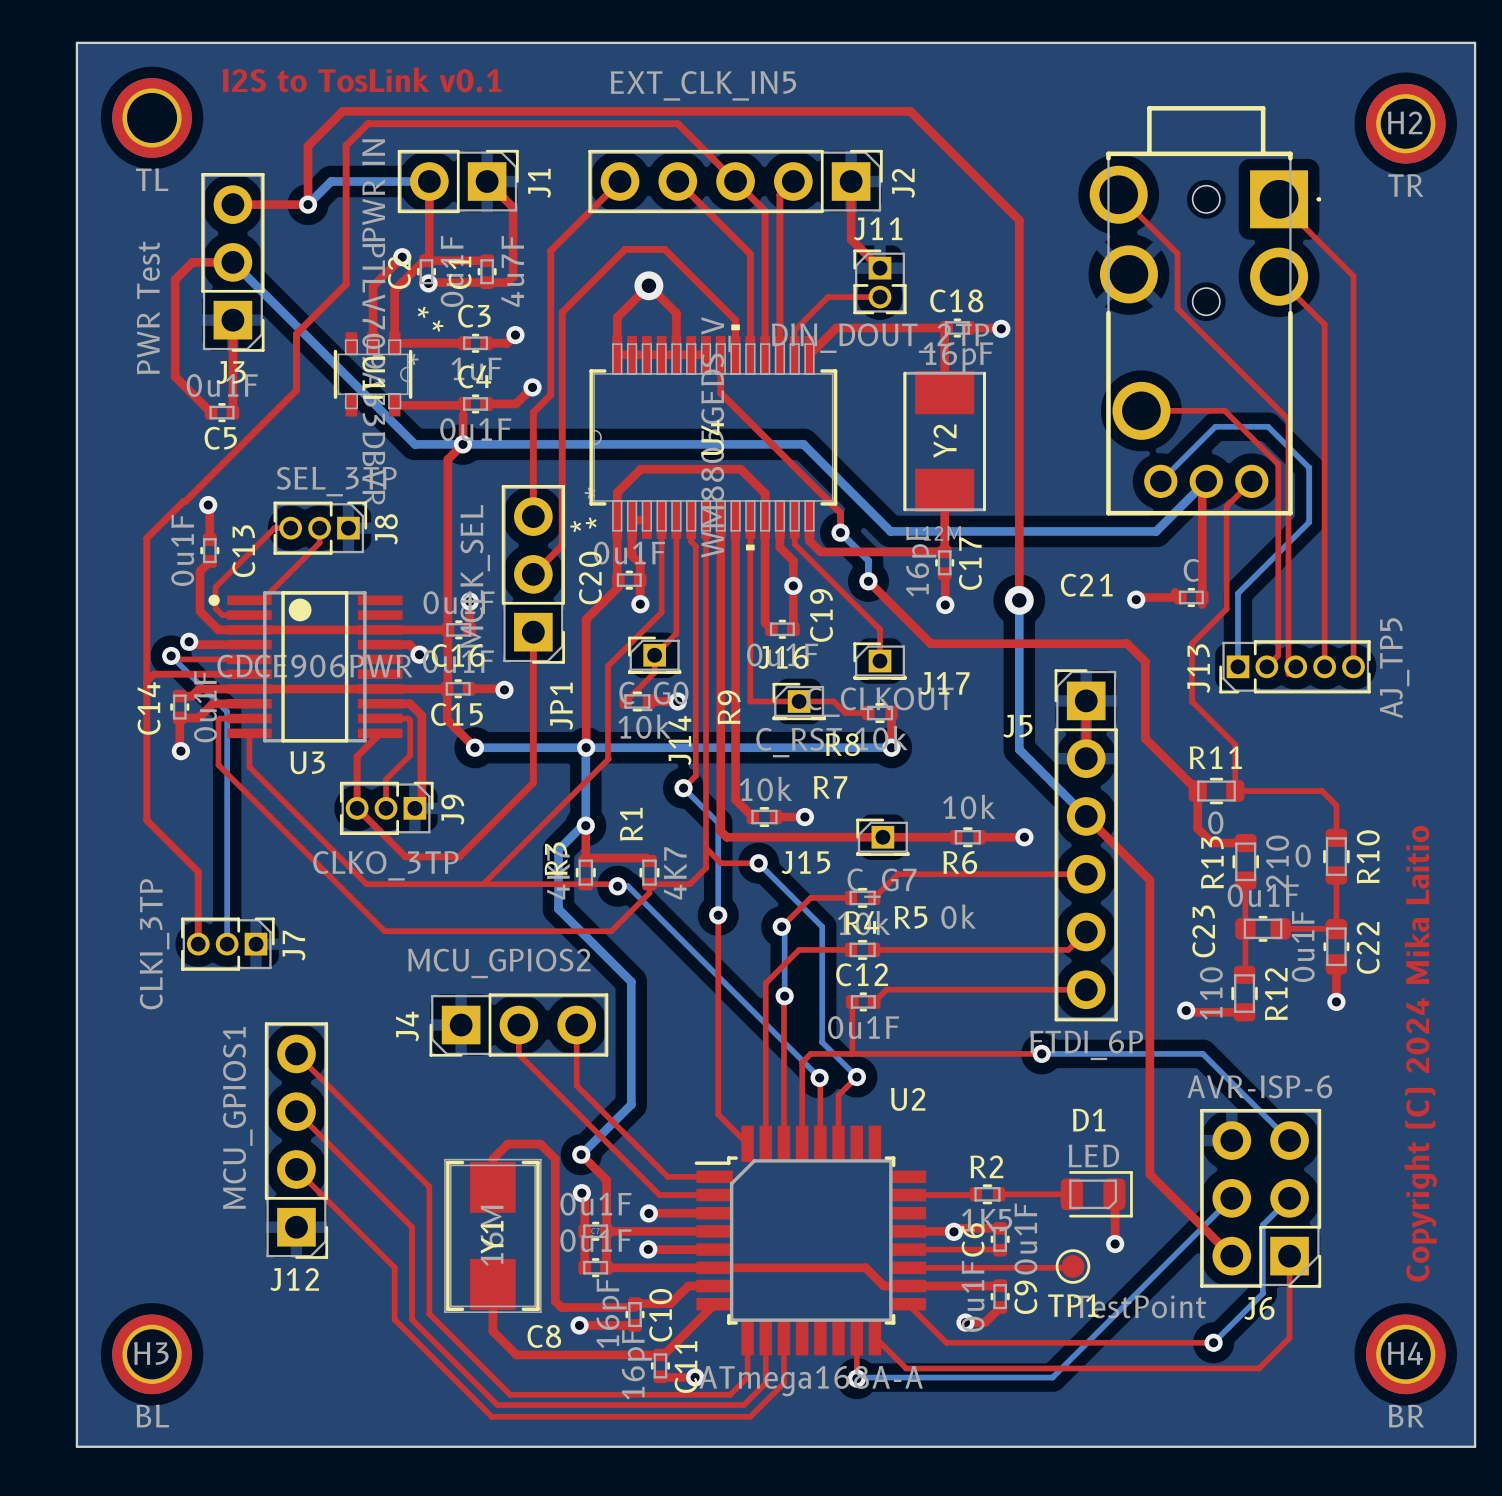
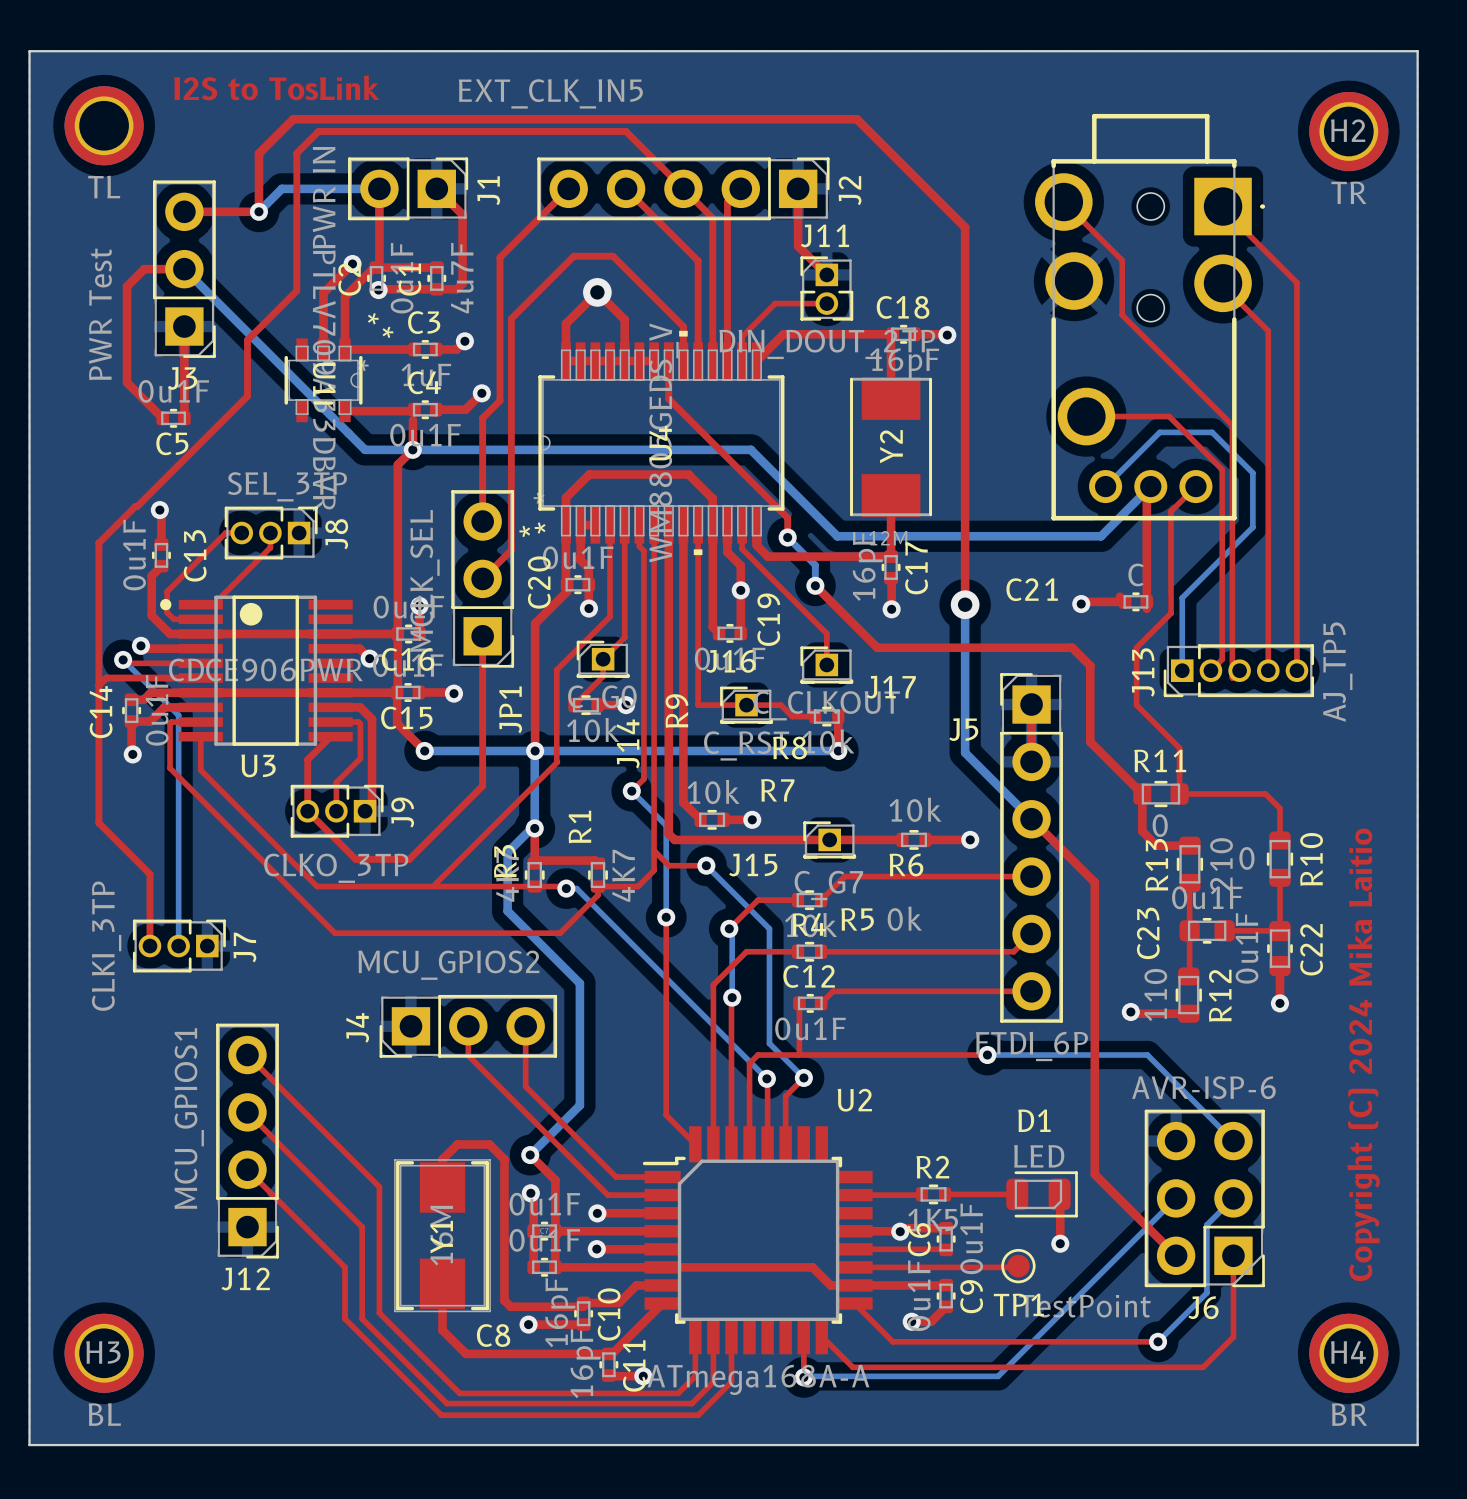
text: I2S to TosLink v0.1 (361, 79) -> I2S to TosLink (276, 87)
J2 value position: EXT_CLK_IN5 (703, 85) -> EXT_CLK_IN5 (550, 93)

